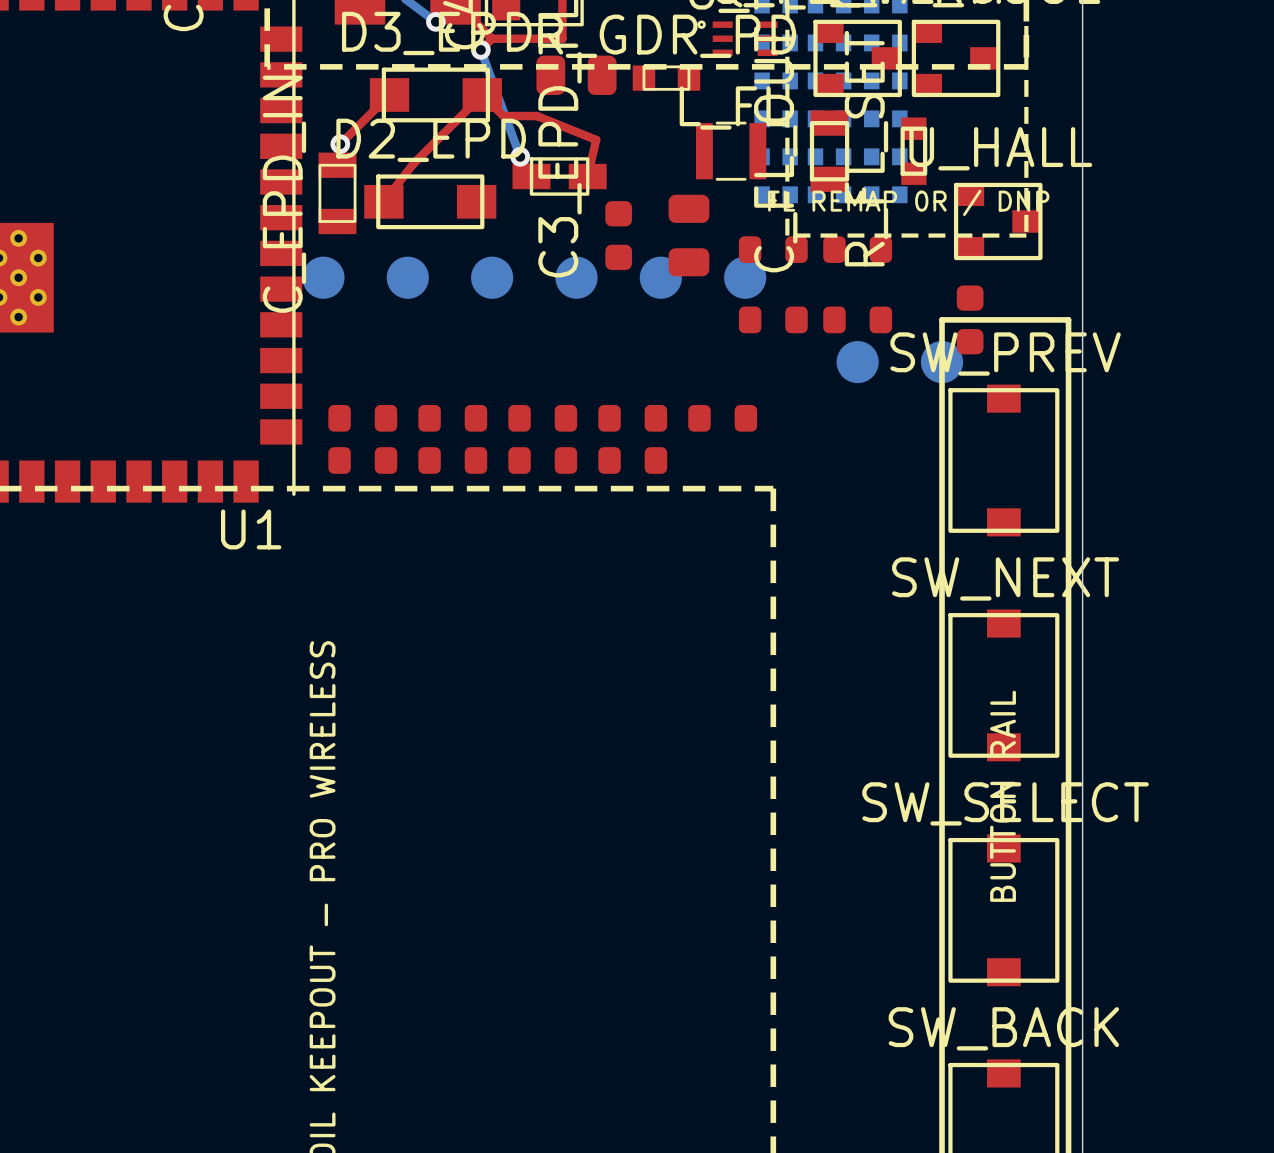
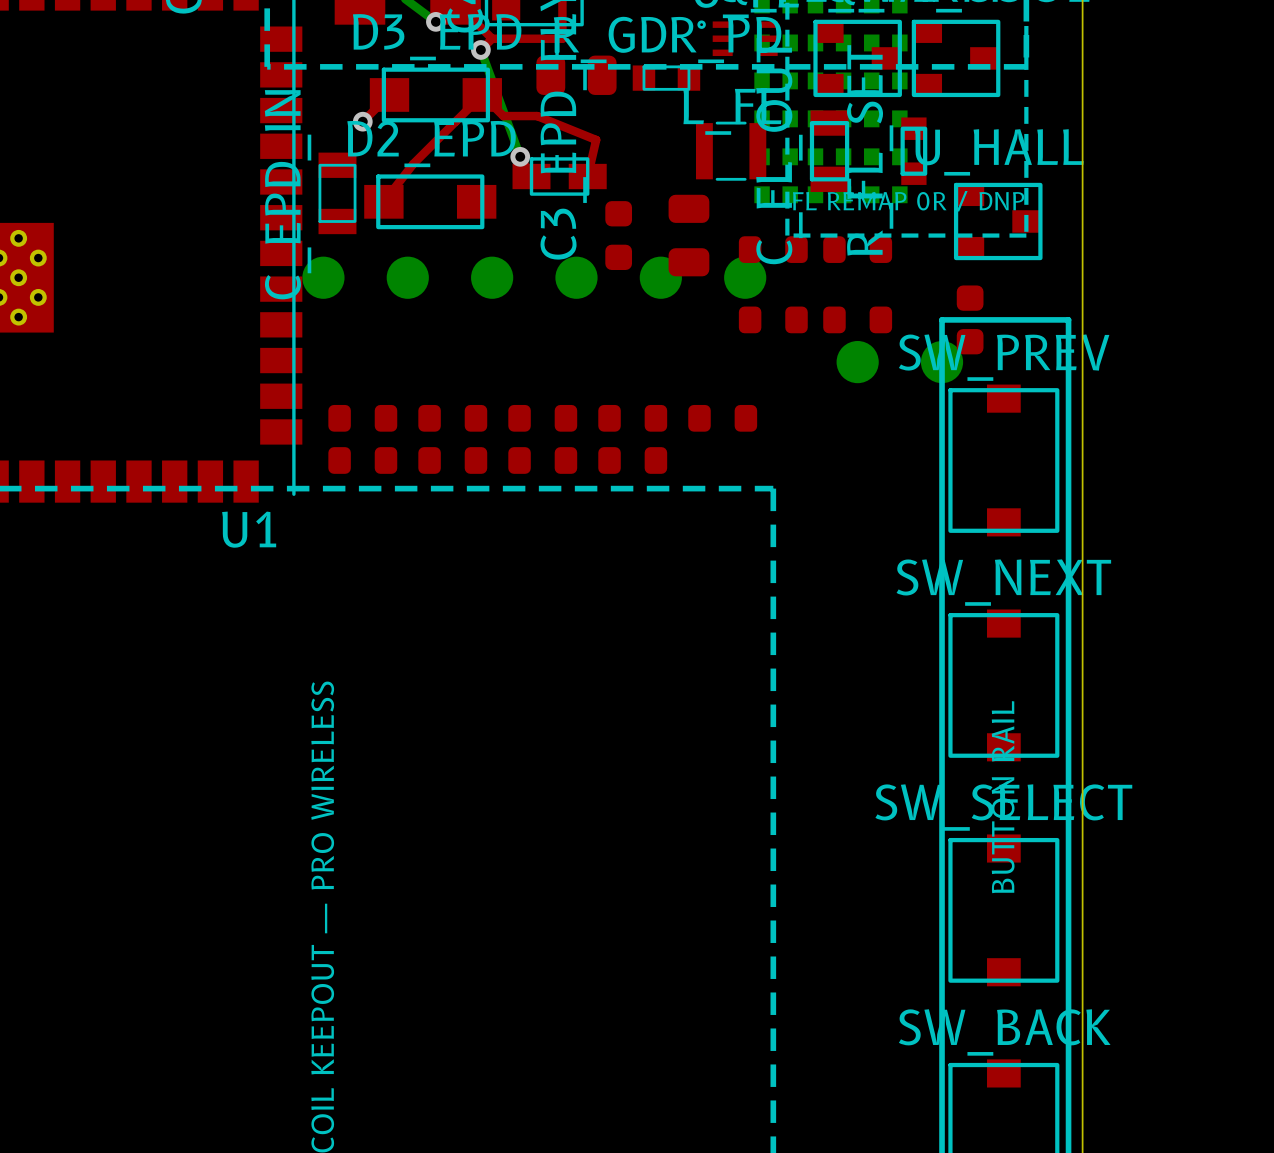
top track: (362, 121) (340, 144) -> none
via position: (340, 144) -> (362, 121)

